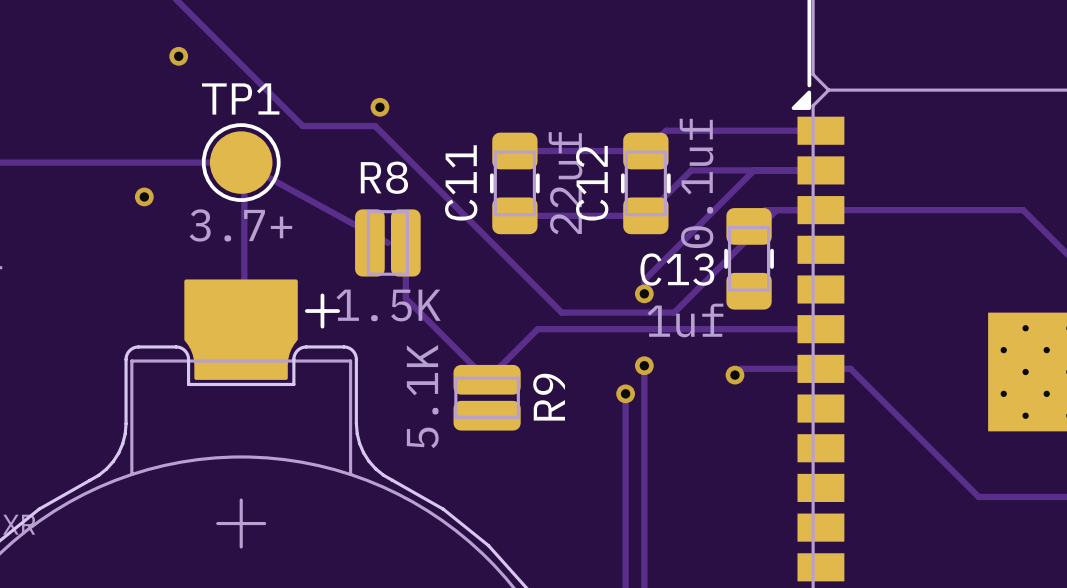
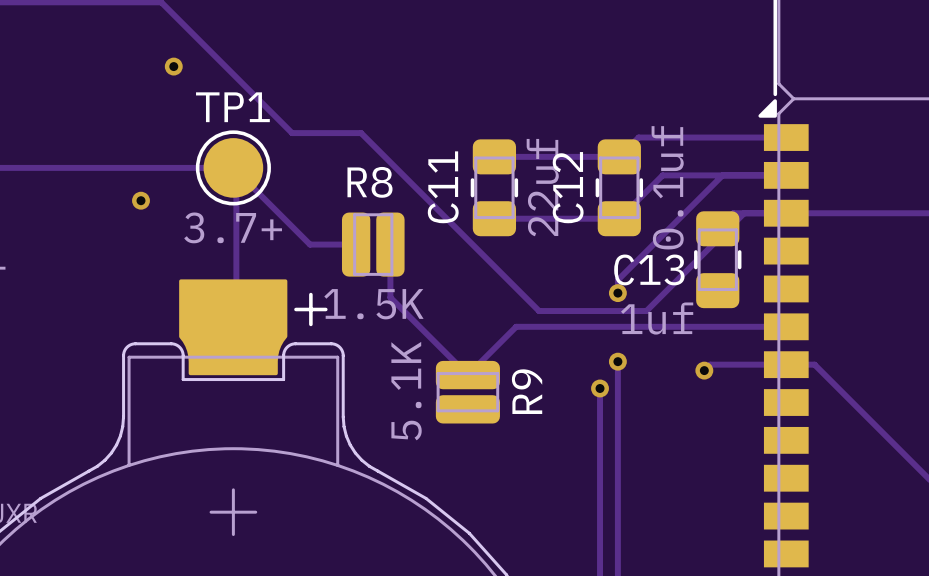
via: (379, 107) -> none
track: (241, 162) (387, 242) -> none
track: none -> (236, 170) (310, 244) (356, 244)

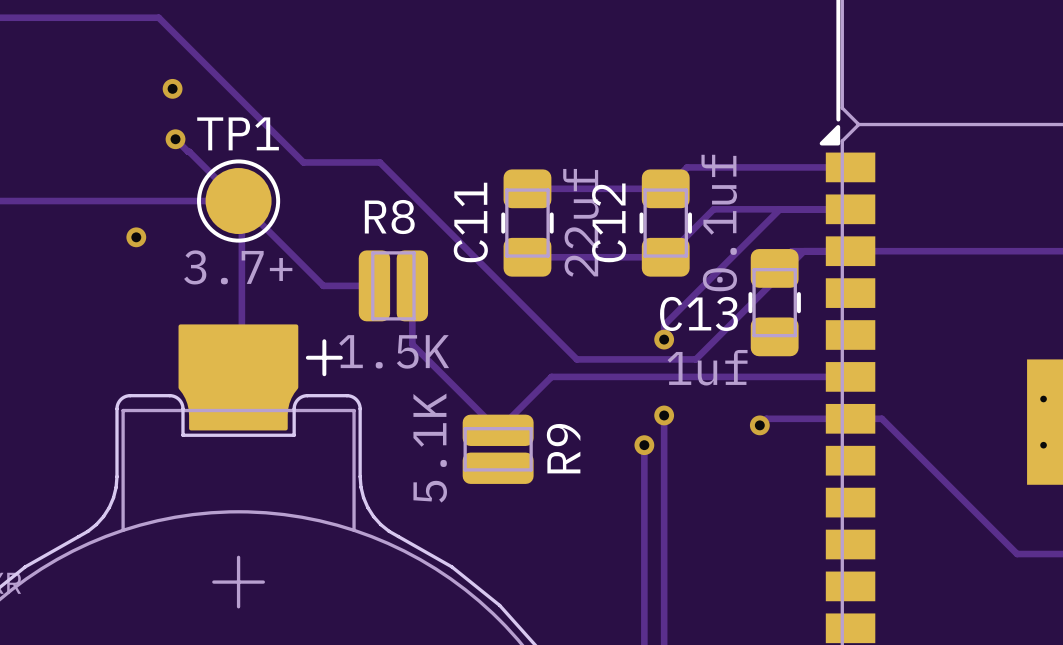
track: none -> (175, 139) (238, 201)
via: none -> (175, 139)

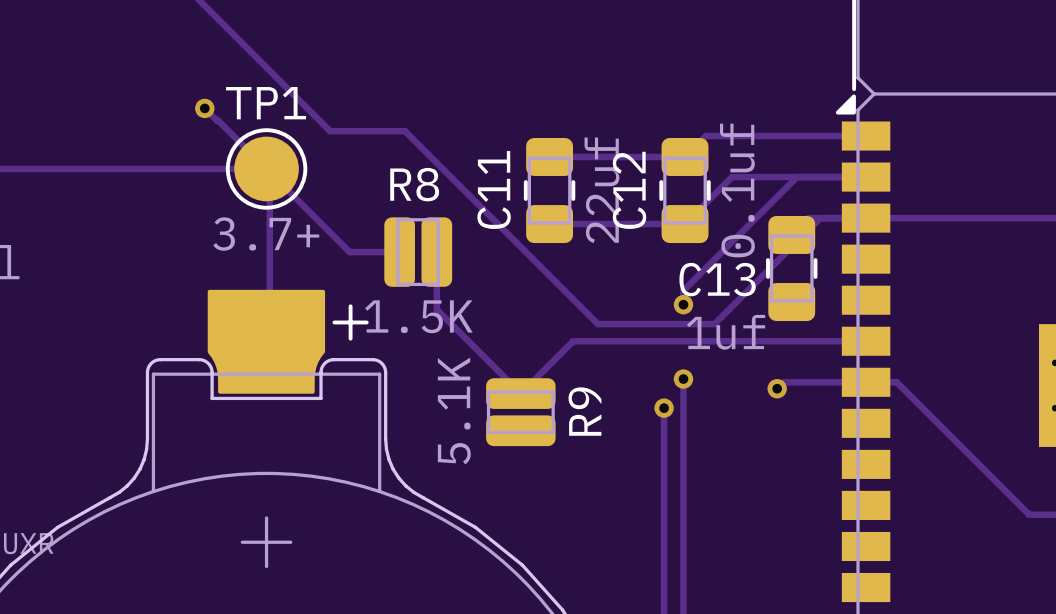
via: (172, 88) -> none
via: (136, 237) -> none

